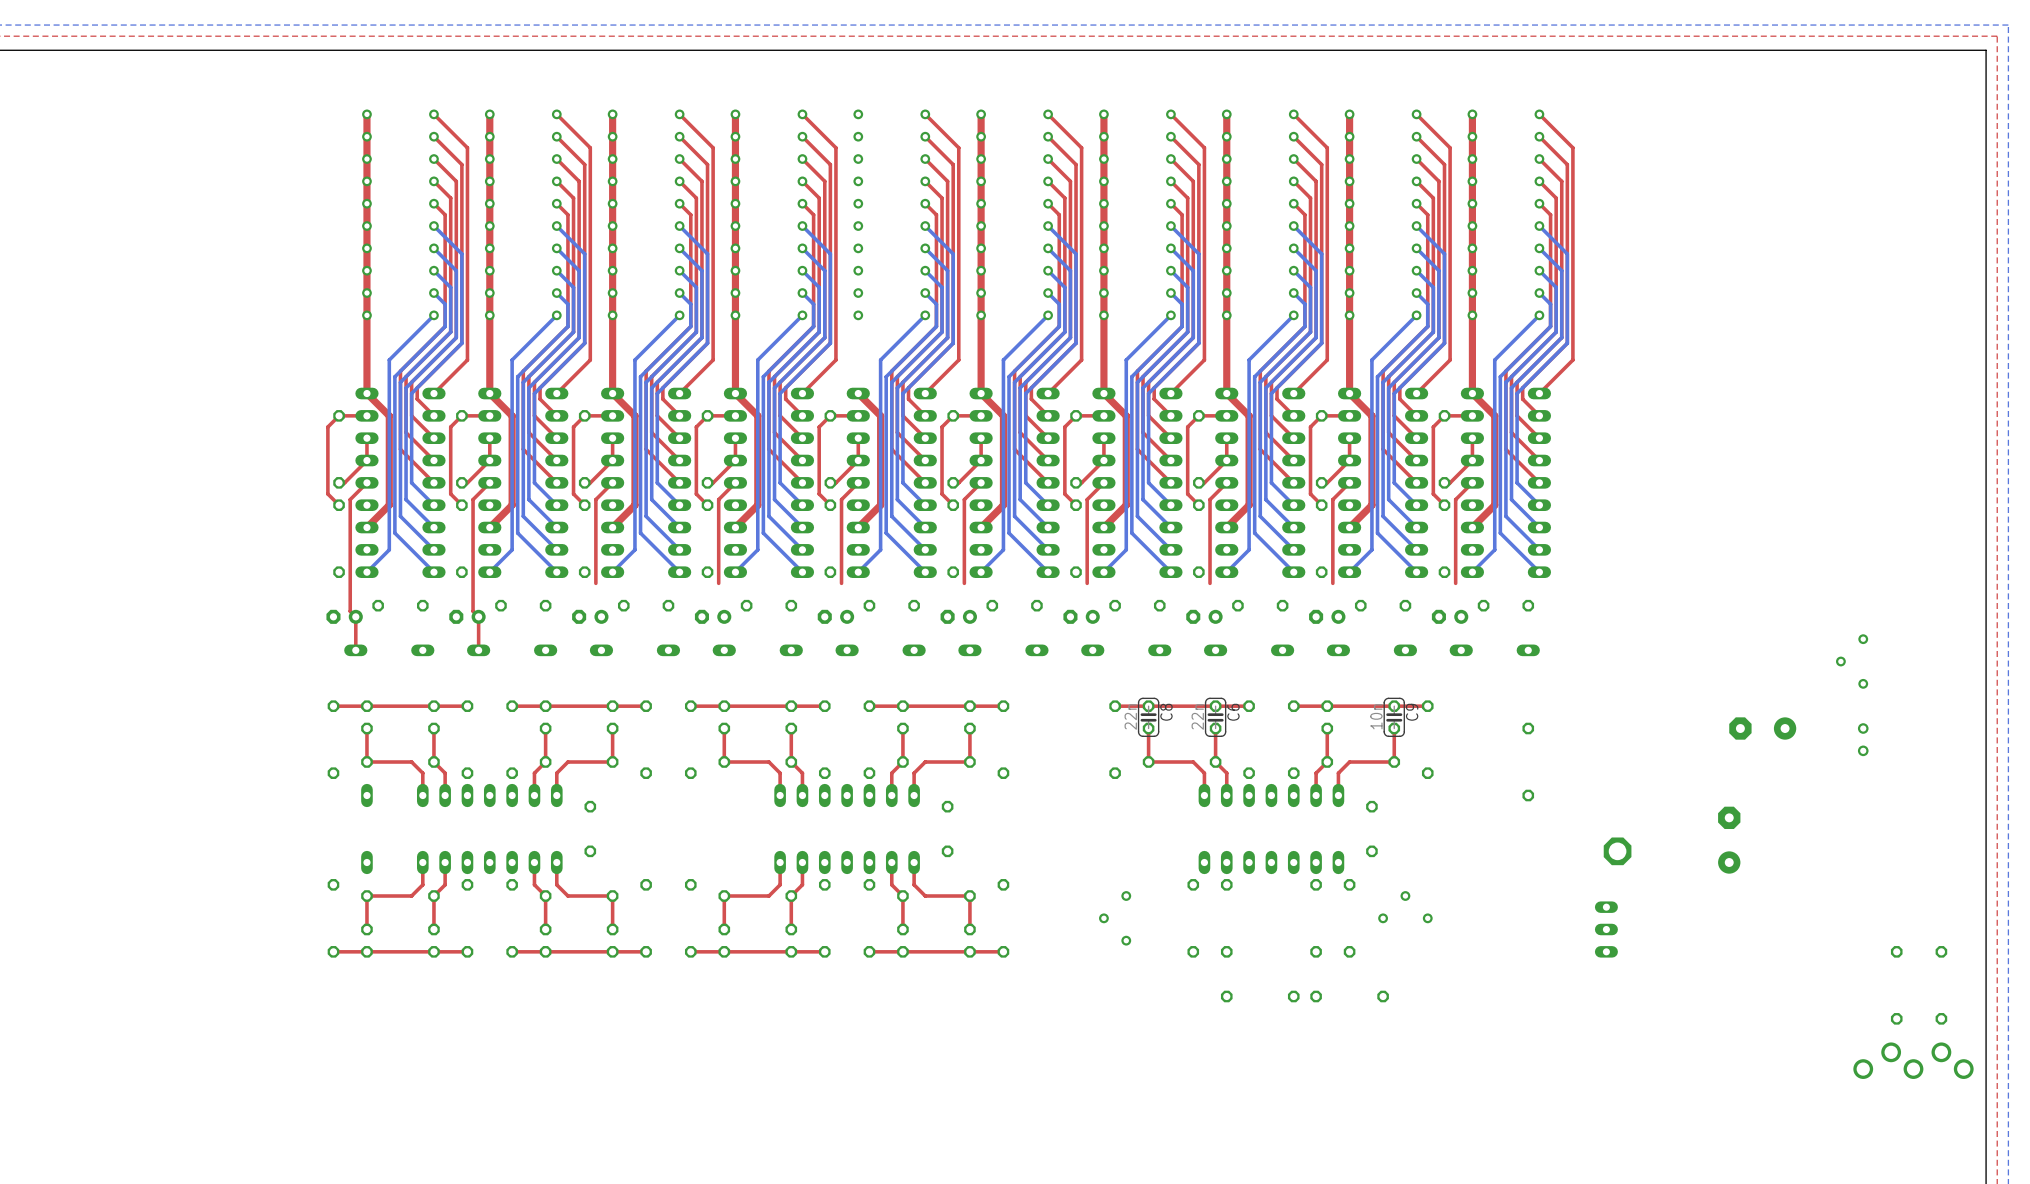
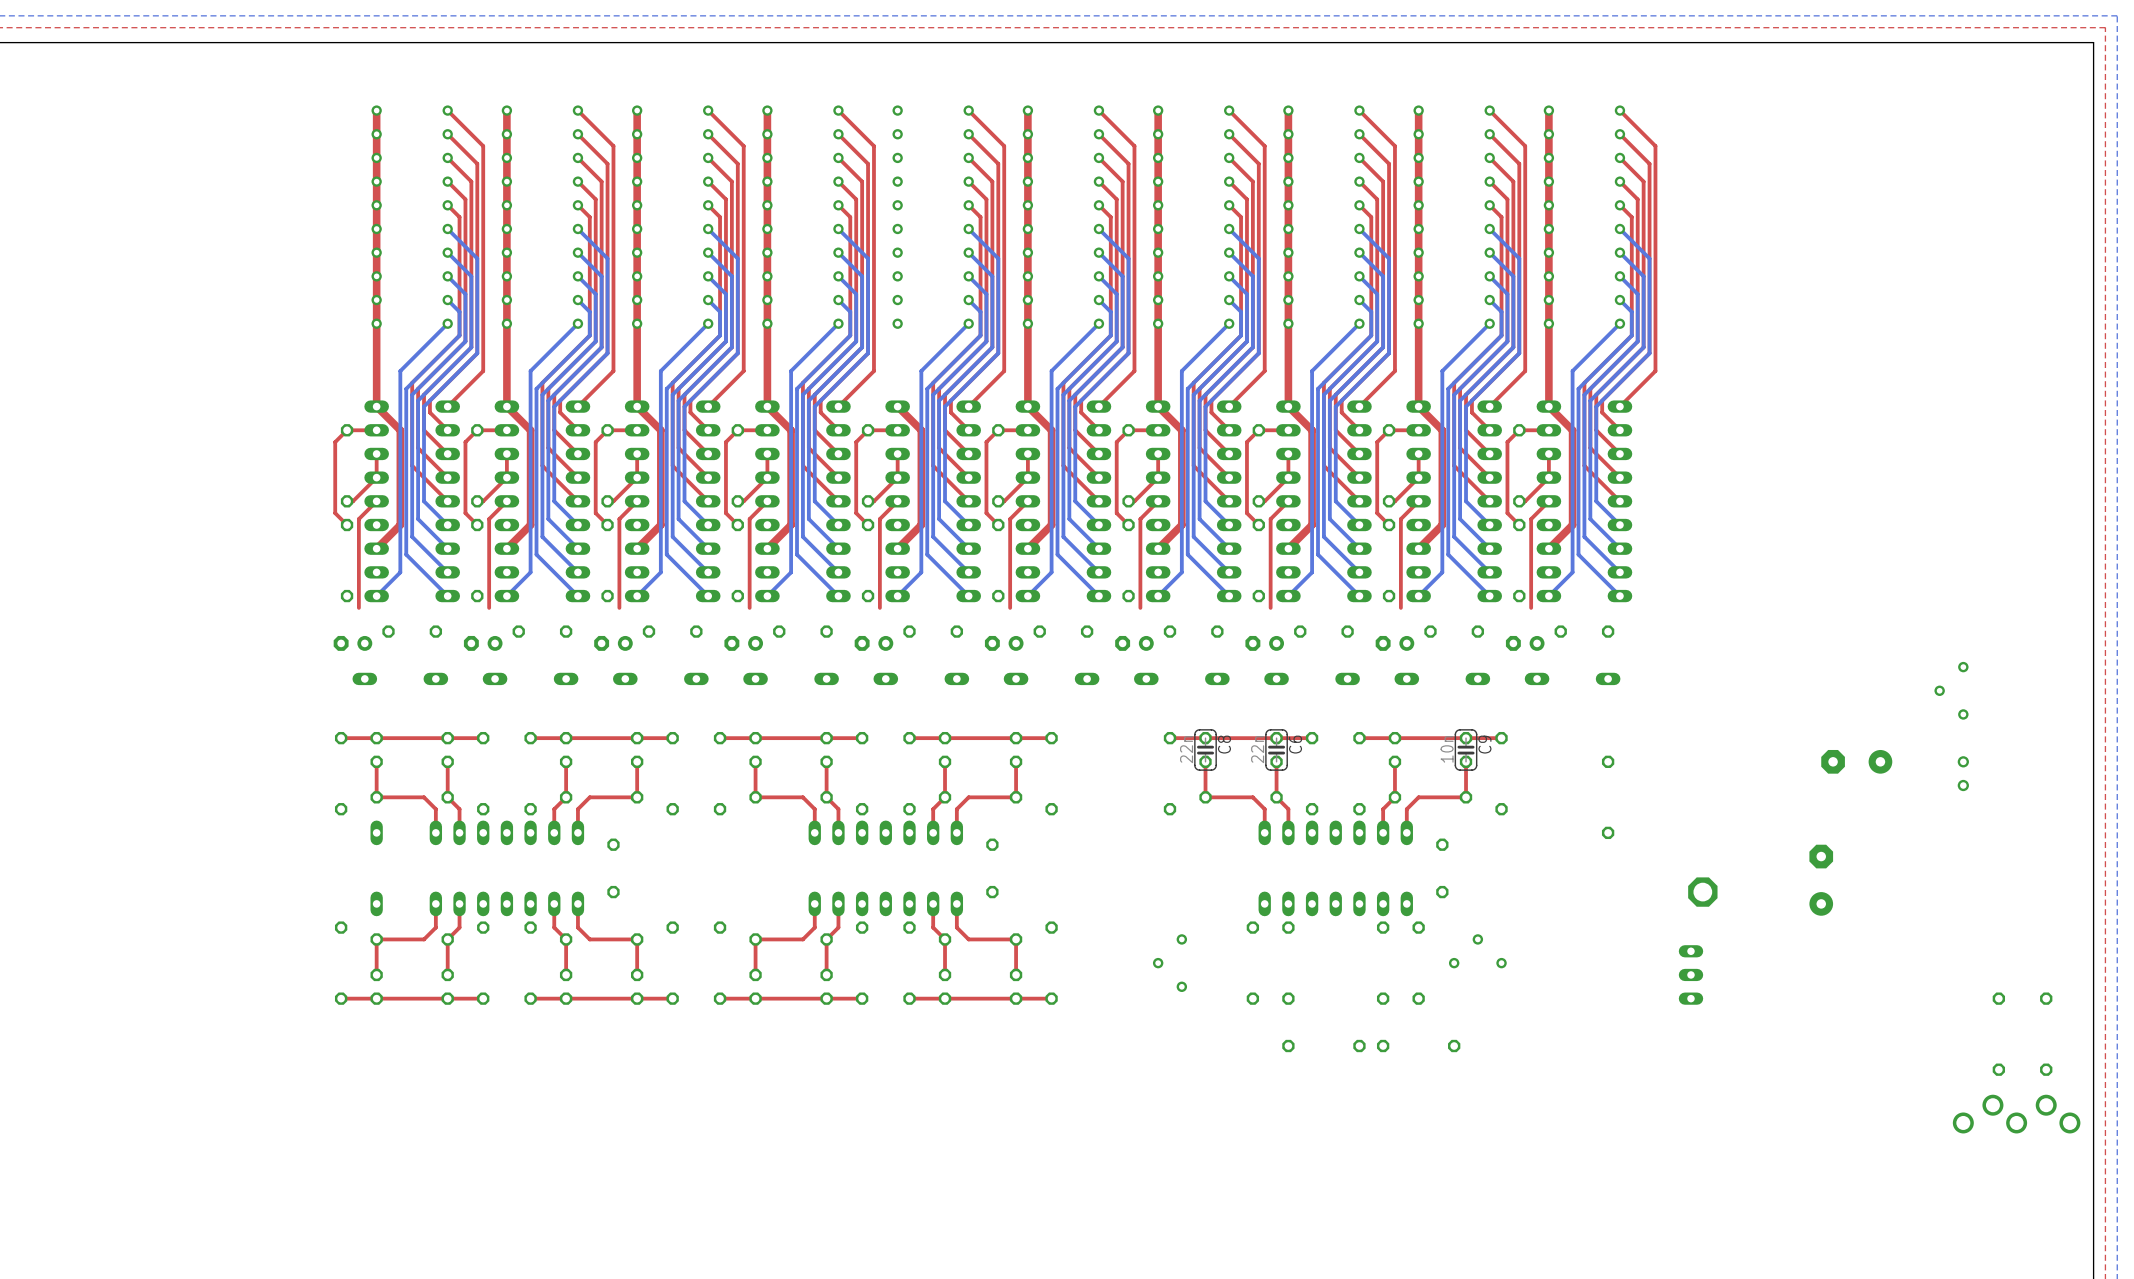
top track: (350, 583) (350, 611) (355, 616) (355, 650) -> none
top track: (473, 583) (473, 611) (478, 616) (478, 650) -> none

